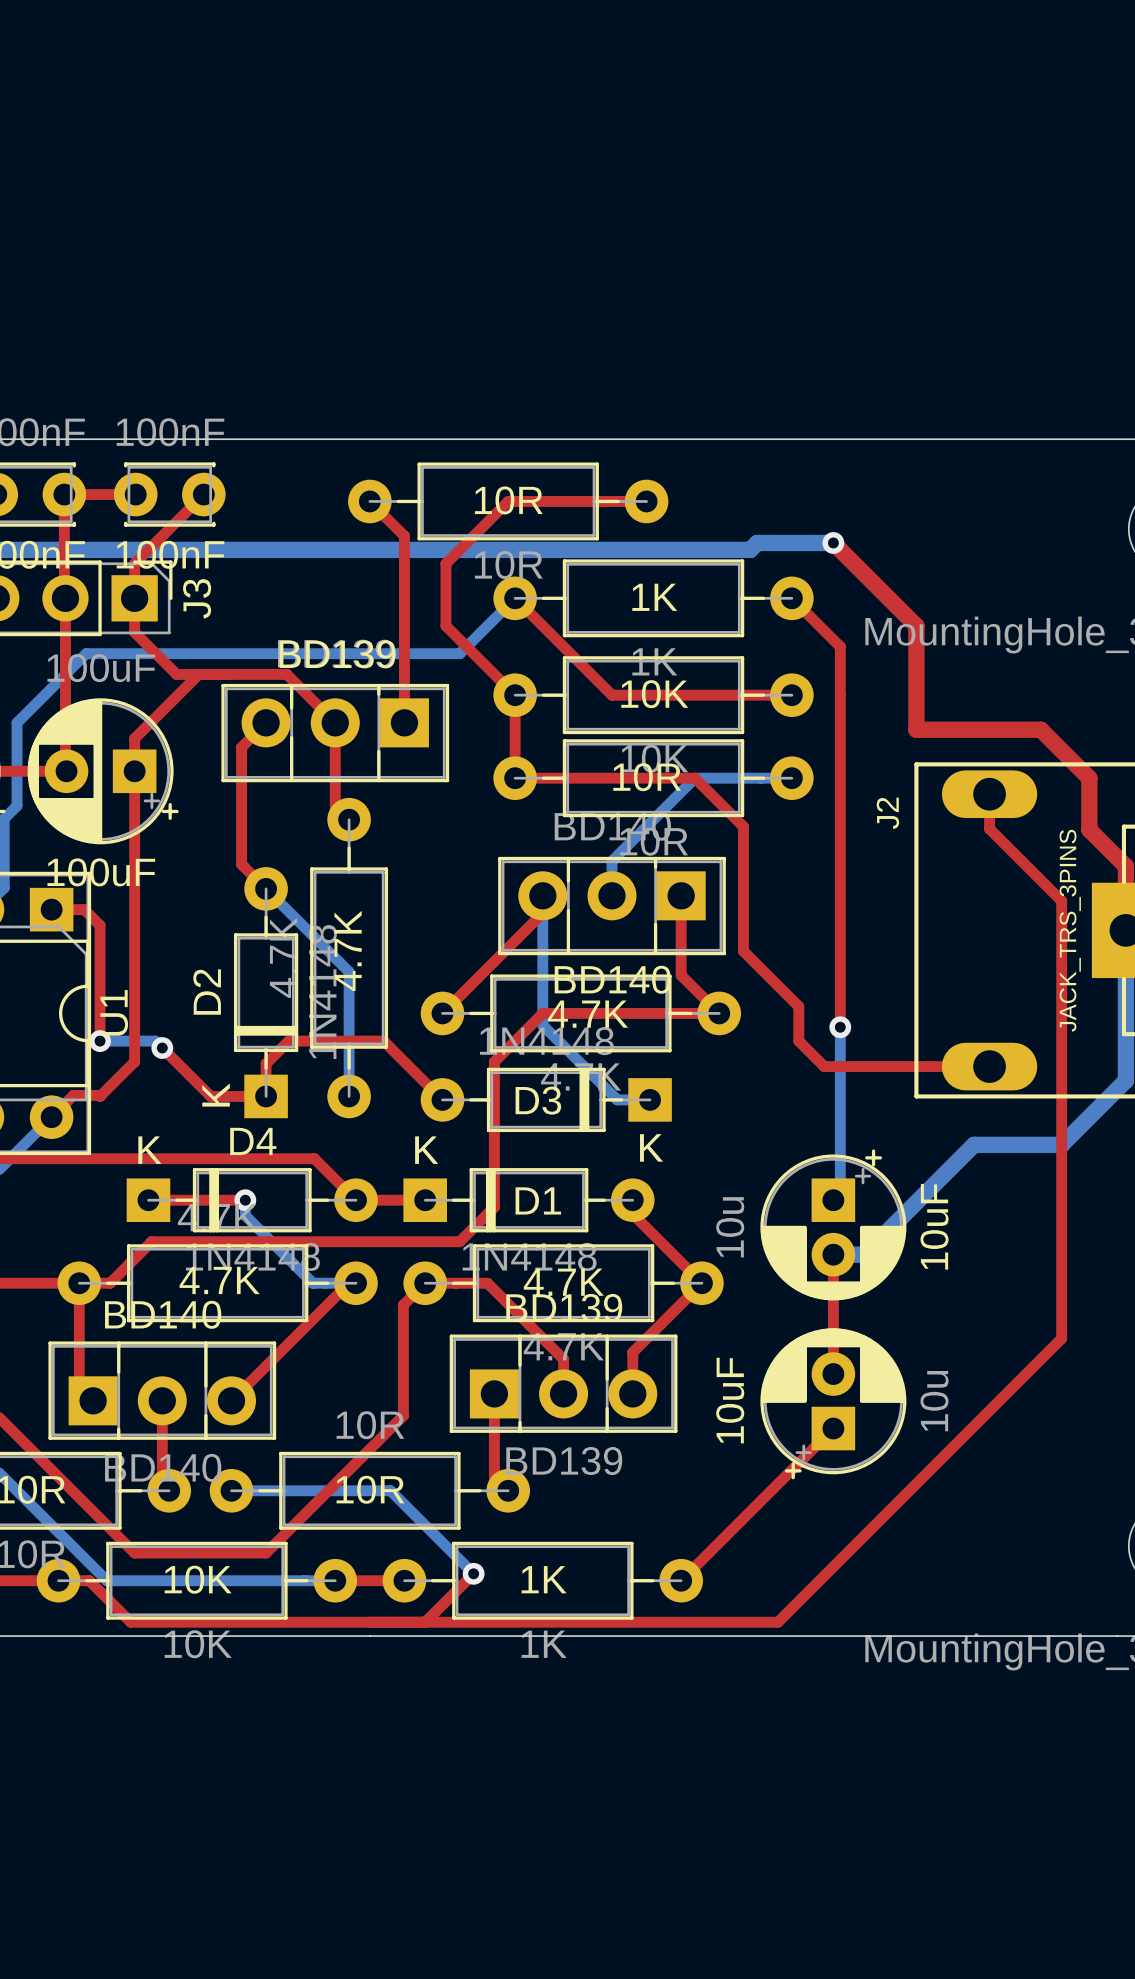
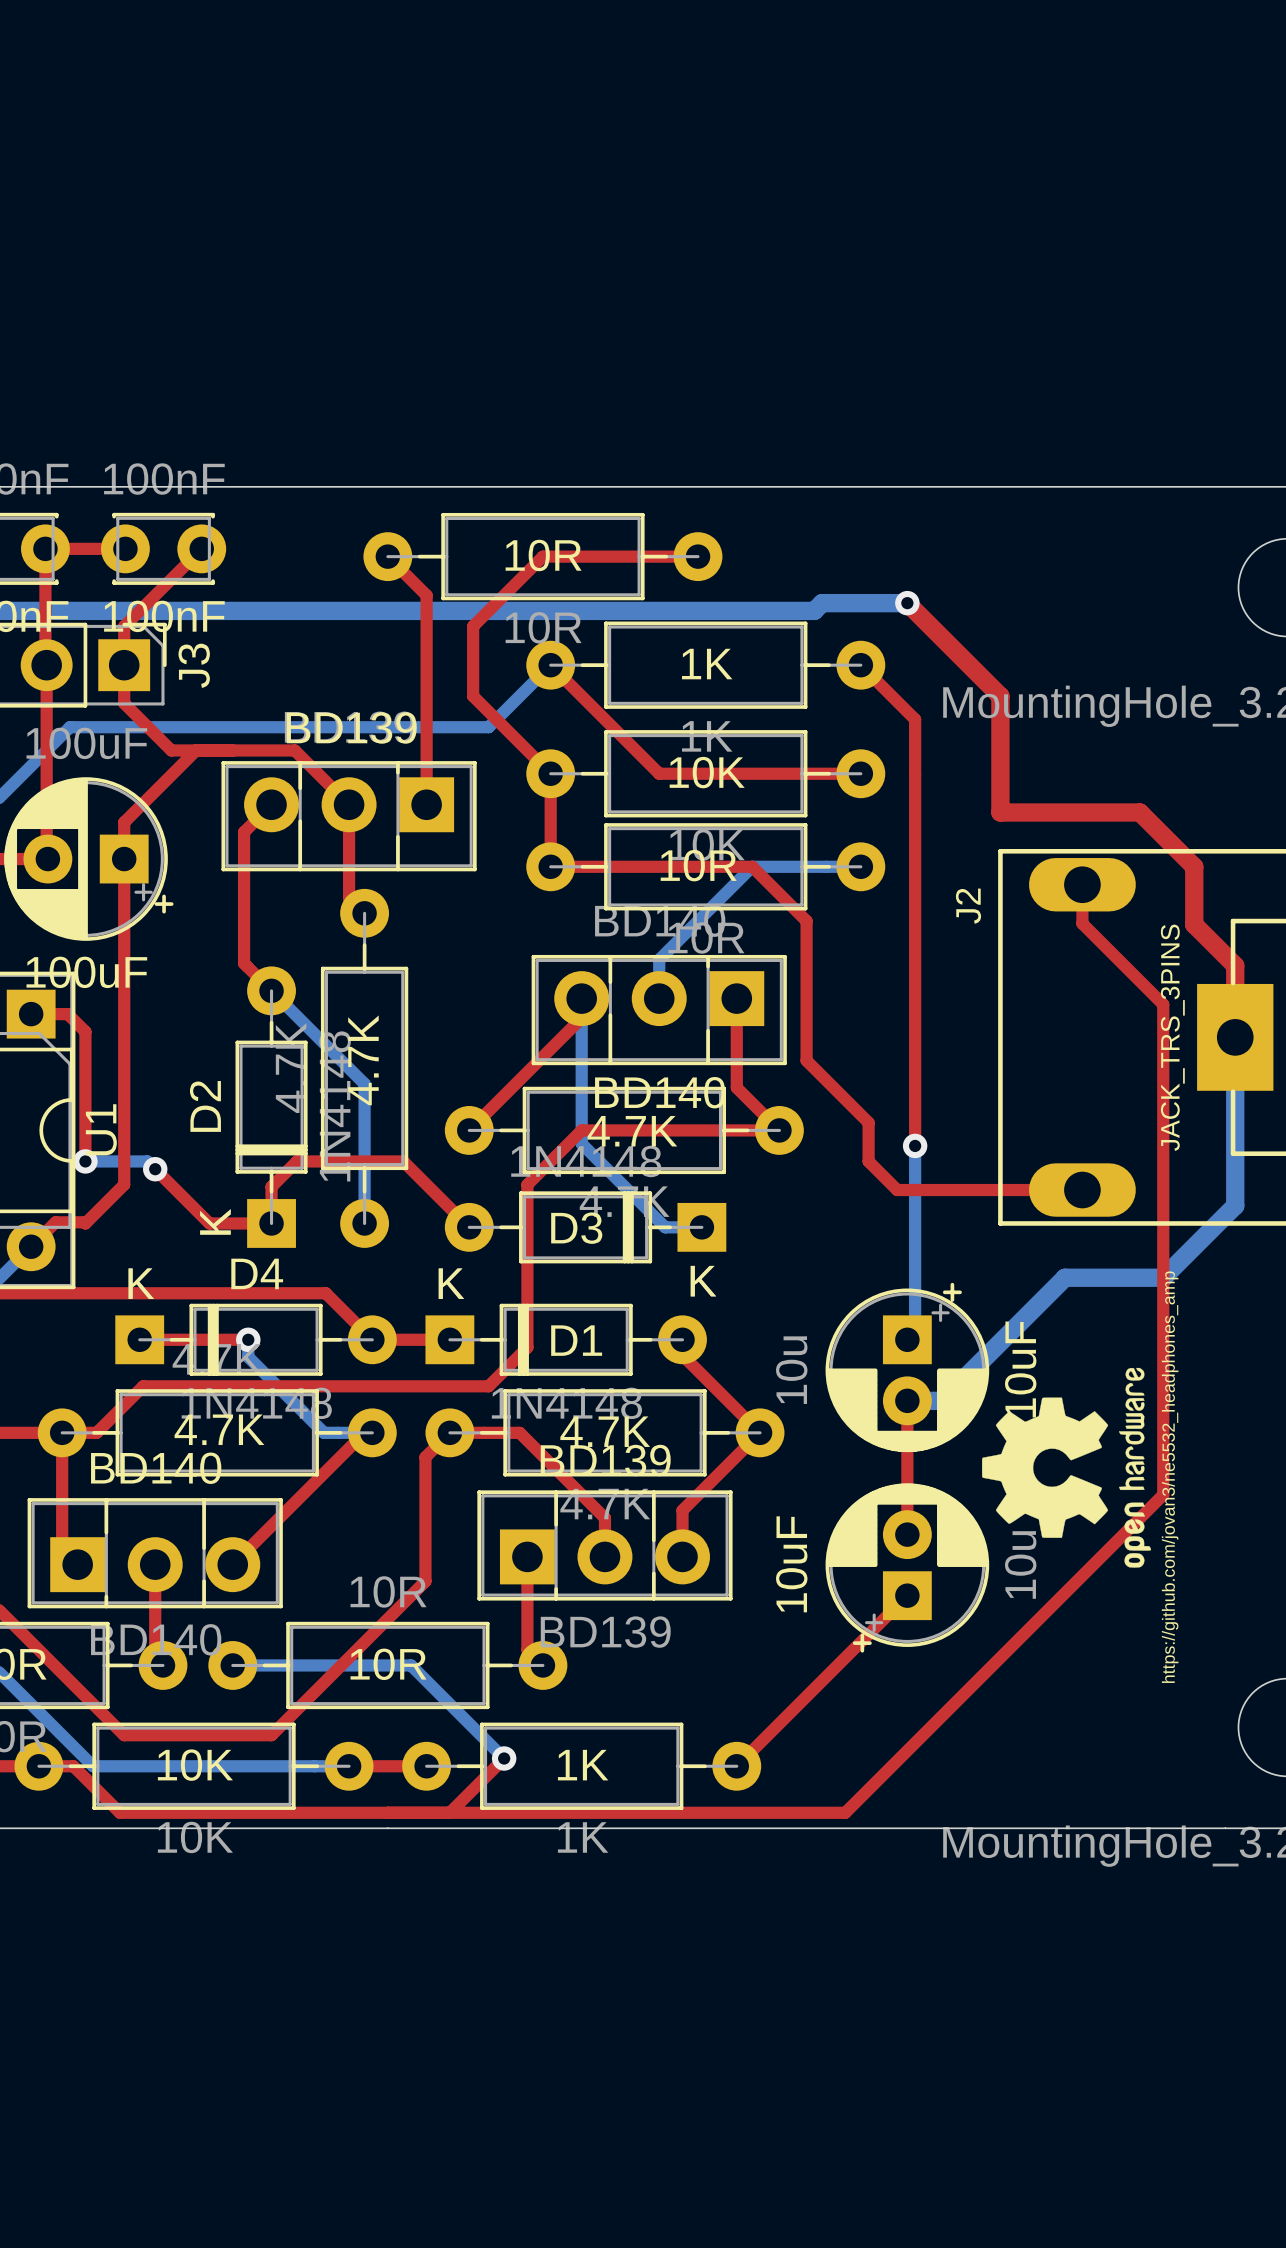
drawing: none -> [981, 1367, 1152, 1568]
text: none -> https://github.com/jovan3/ne5532_headphones_amp (1170, 1477)

